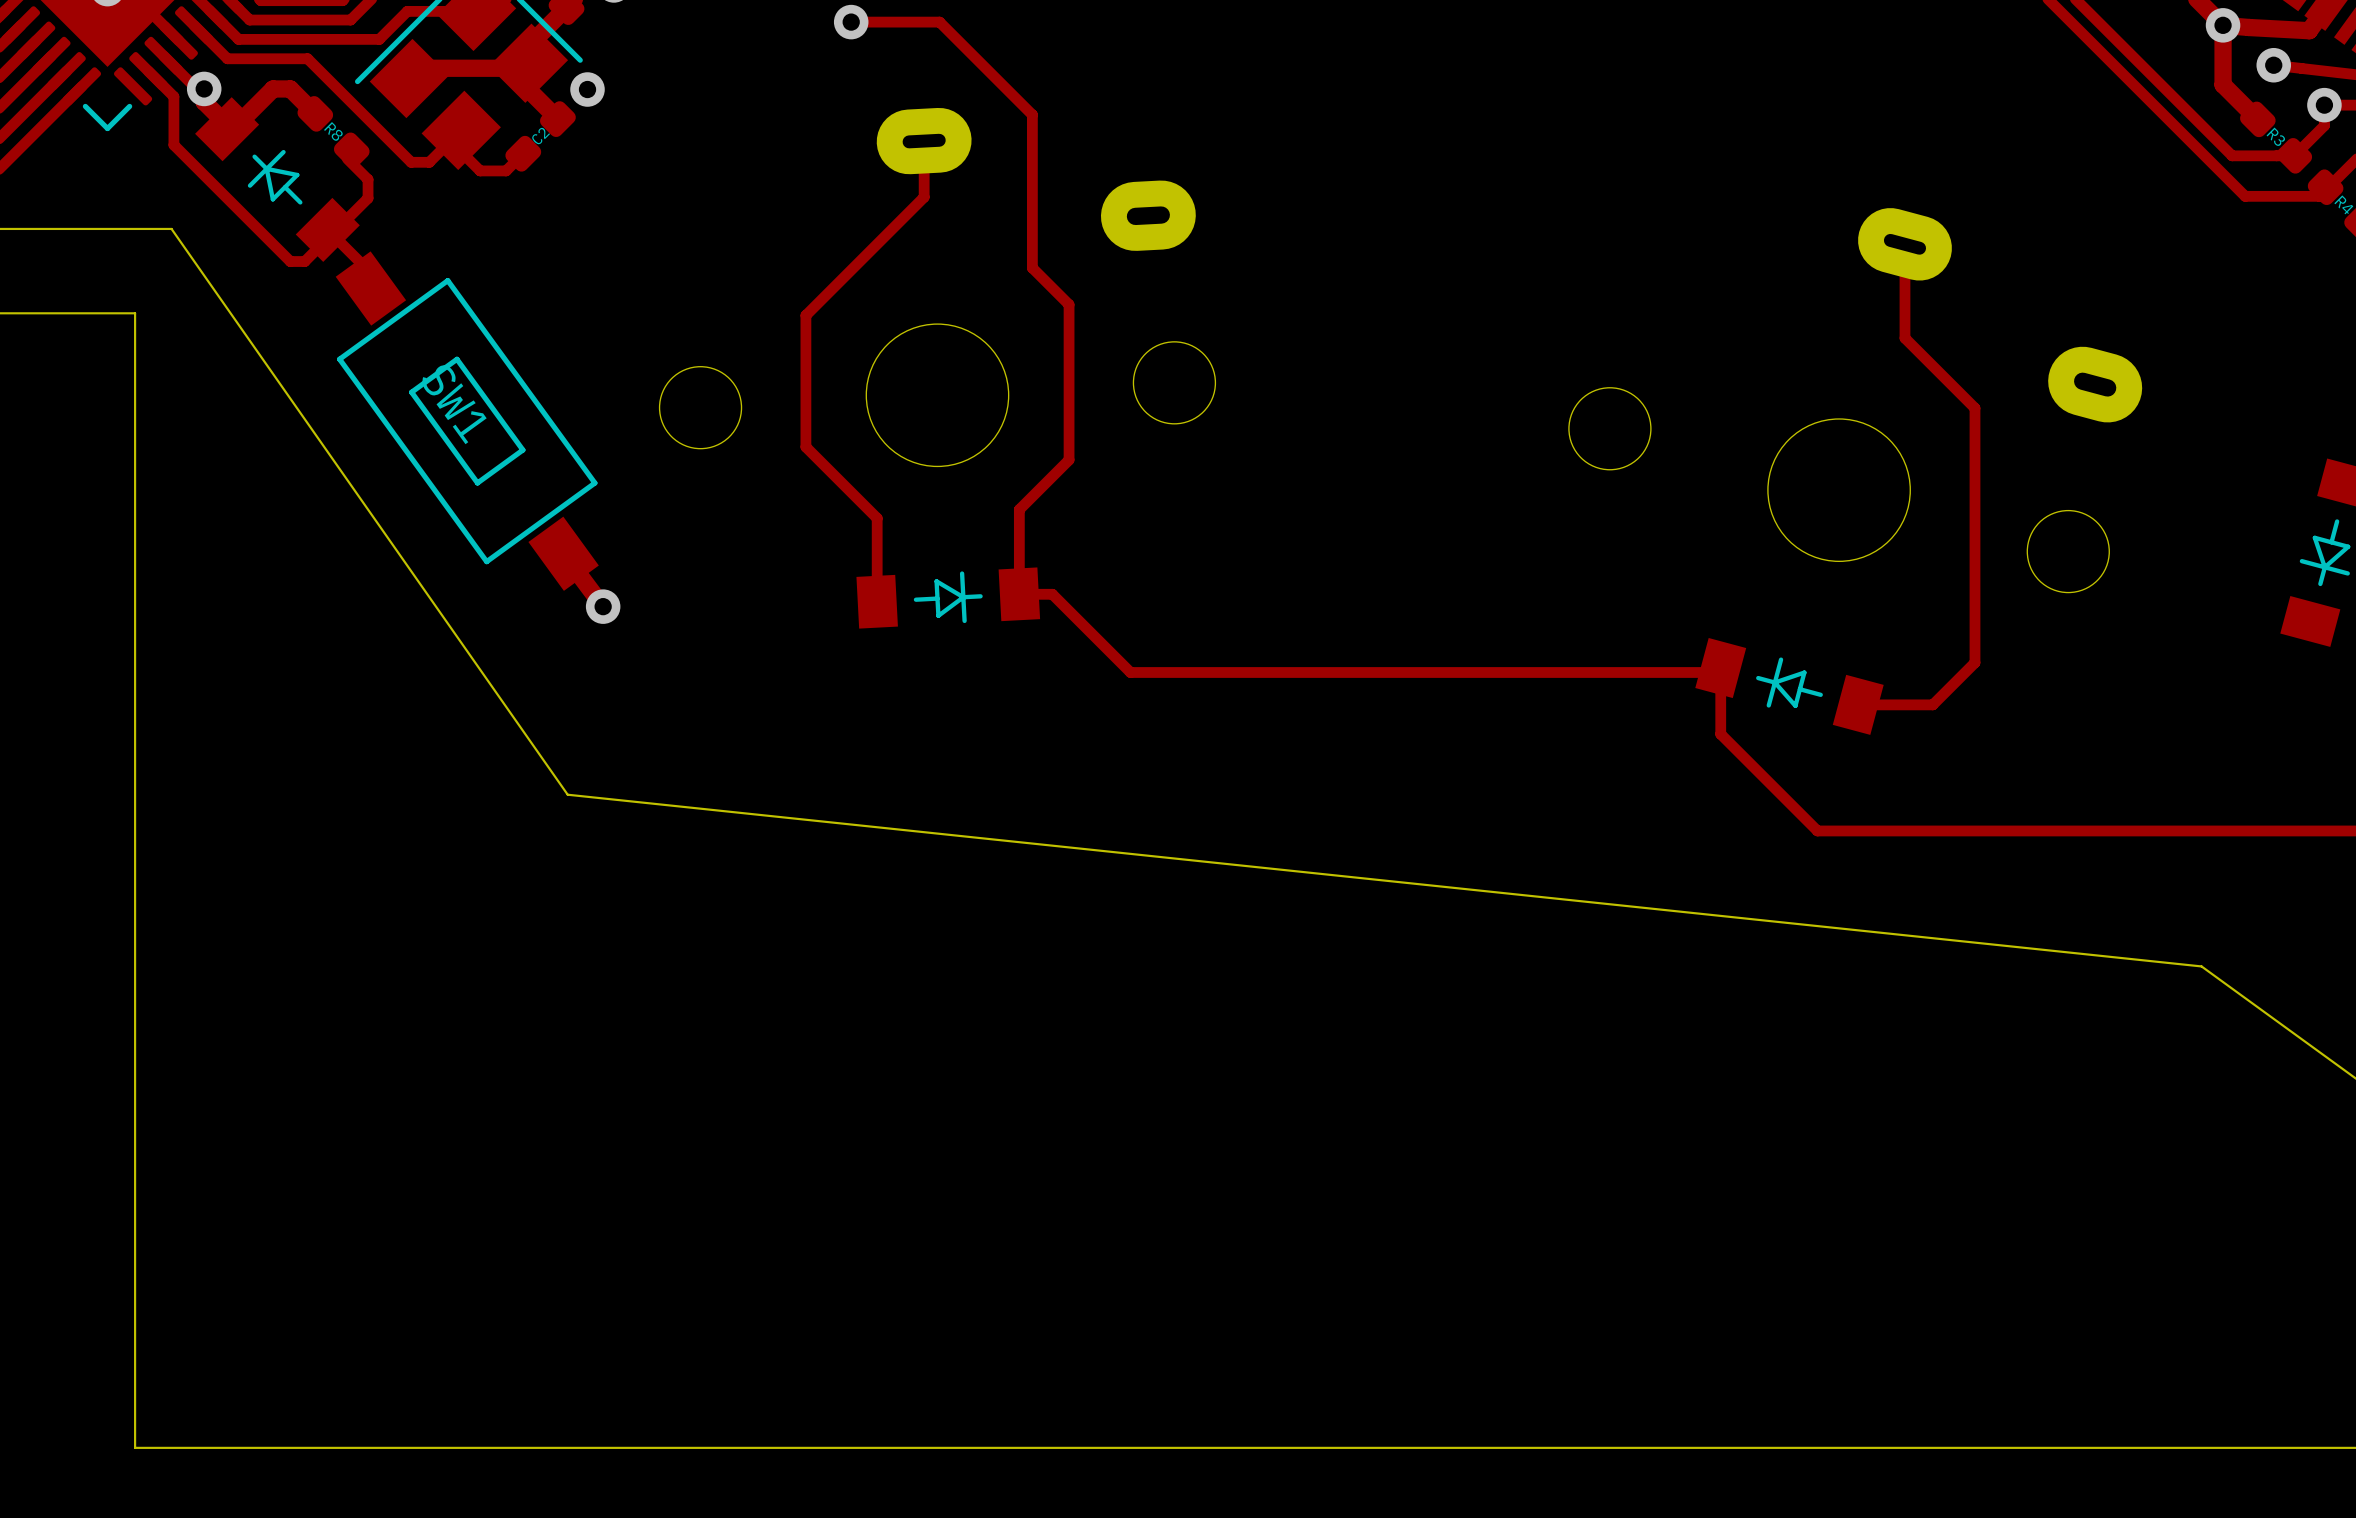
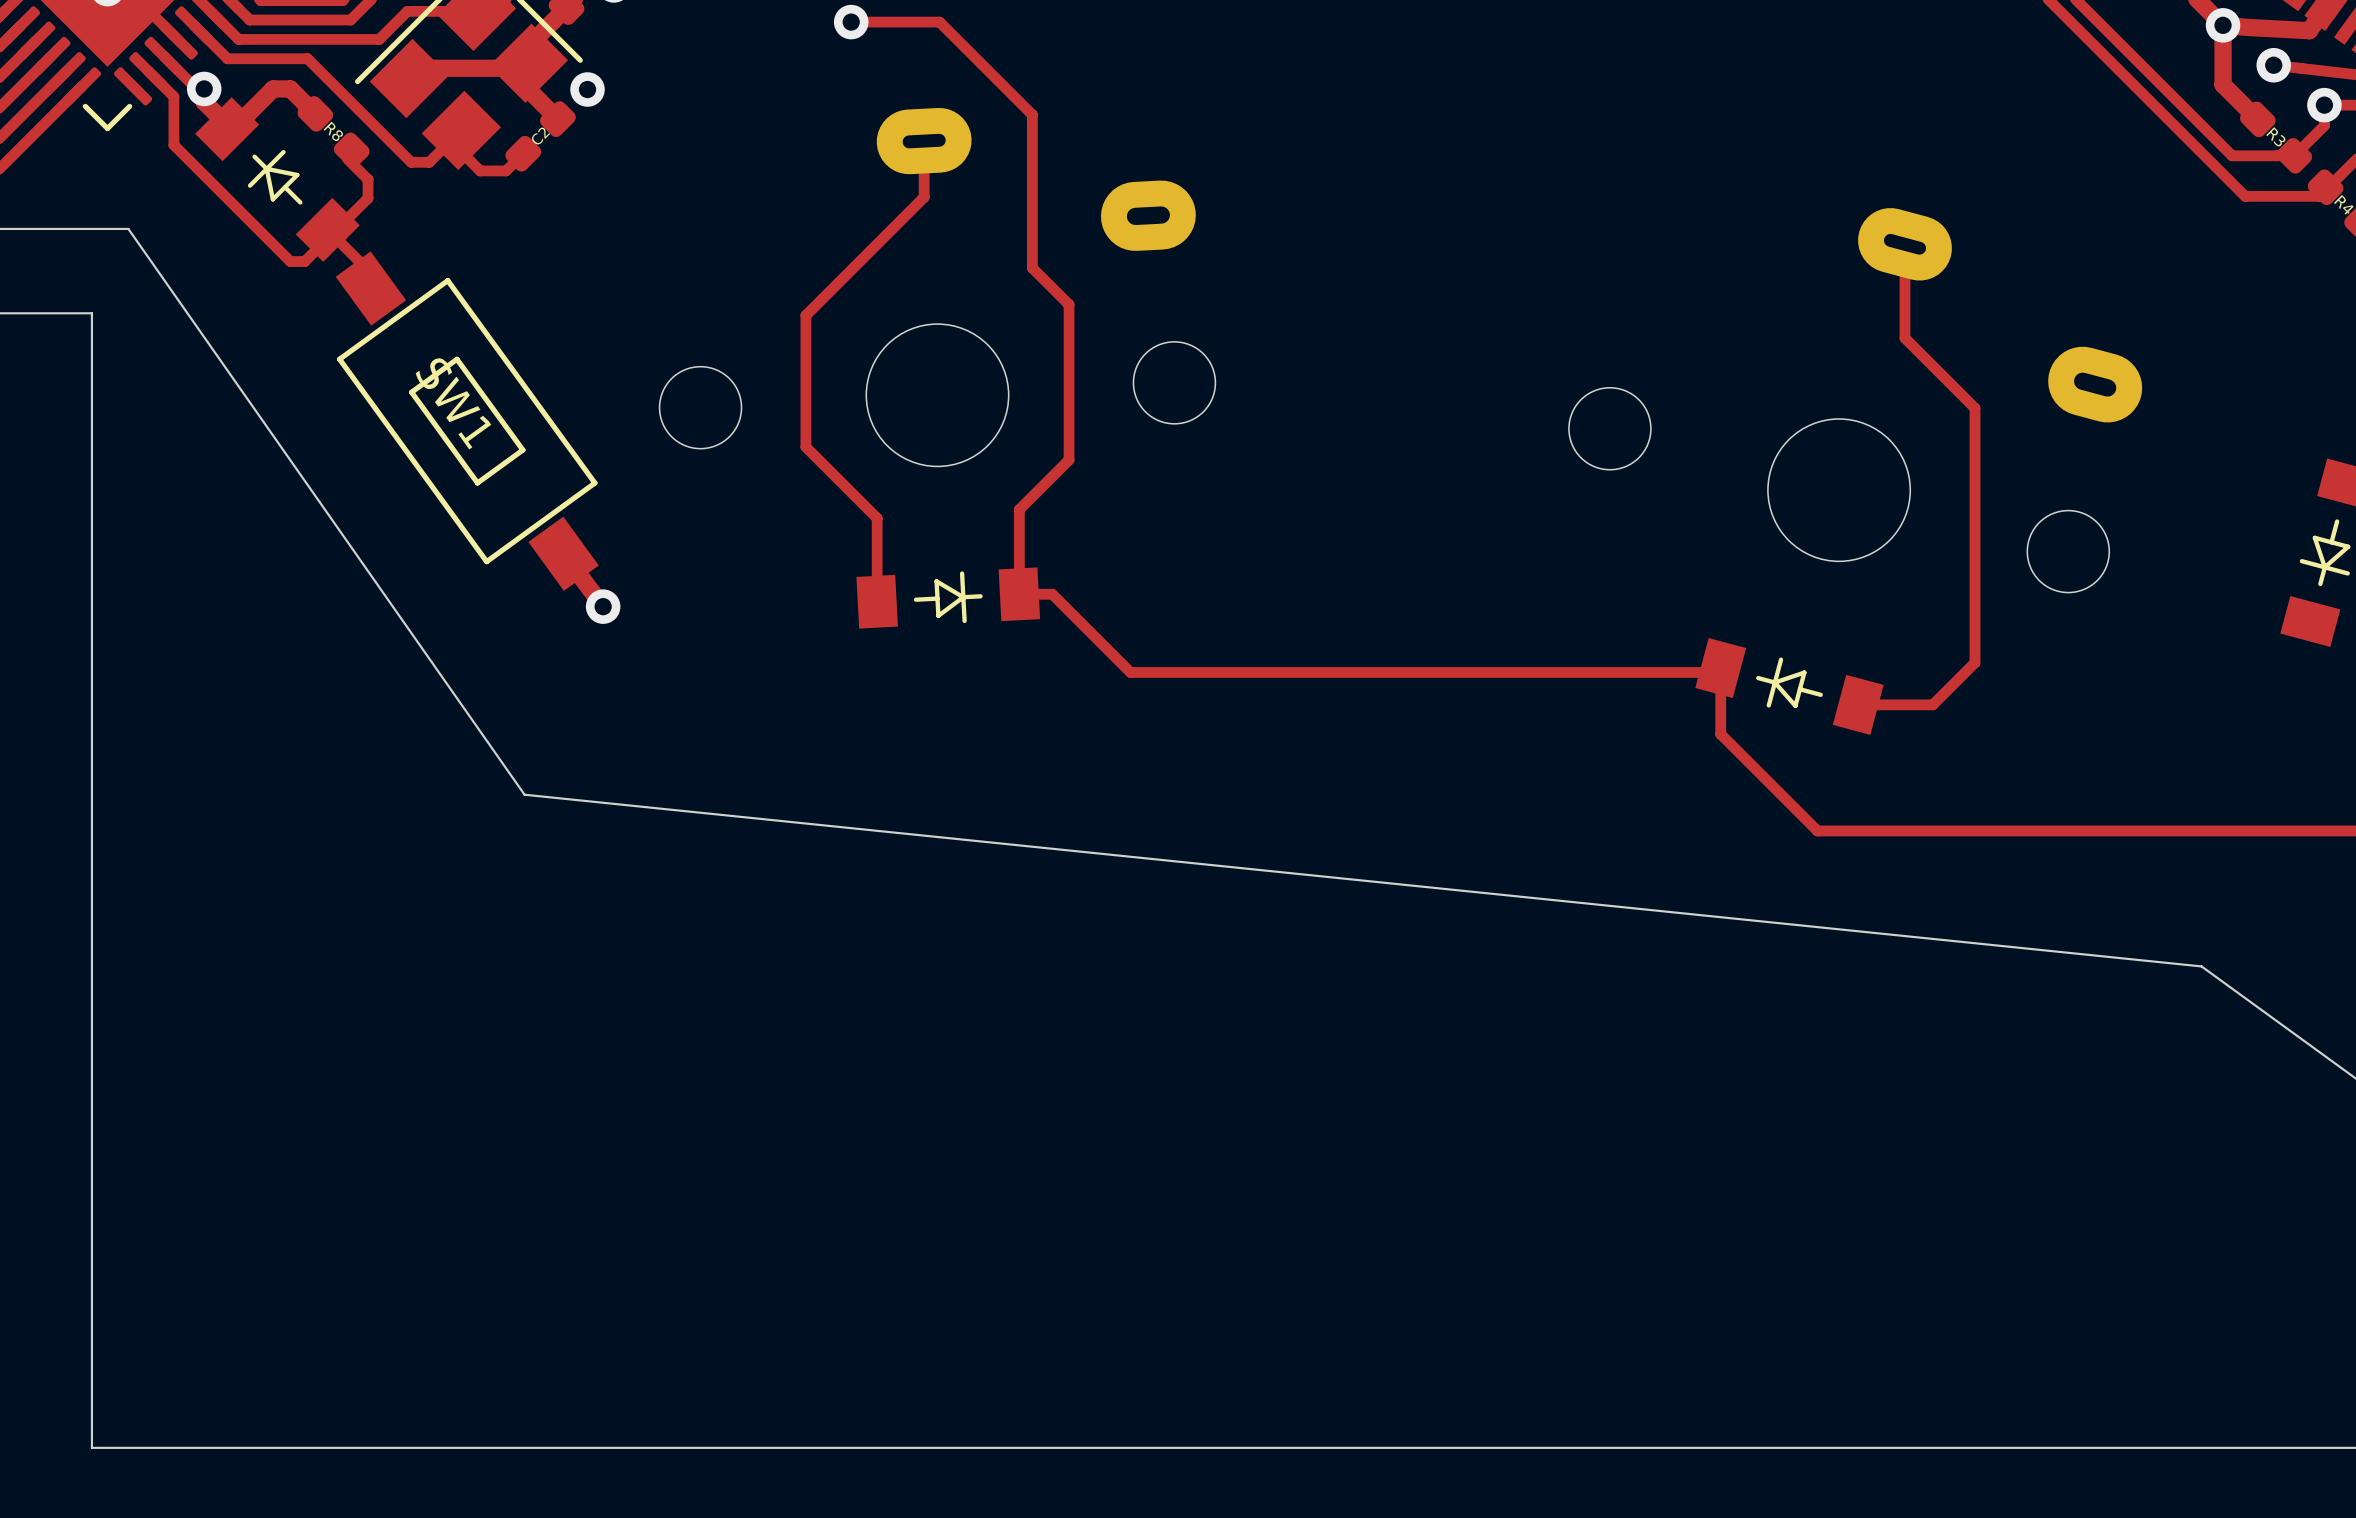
board edge: (128, 228) (171, 228) (567, 794) (2201, 966) -> (128, 228) (524, 794) (2201, 966)
board edge: (91, 313) (135, 313) (135, 1447) -> (91, 313) (91, 1447) (135, 1447)

